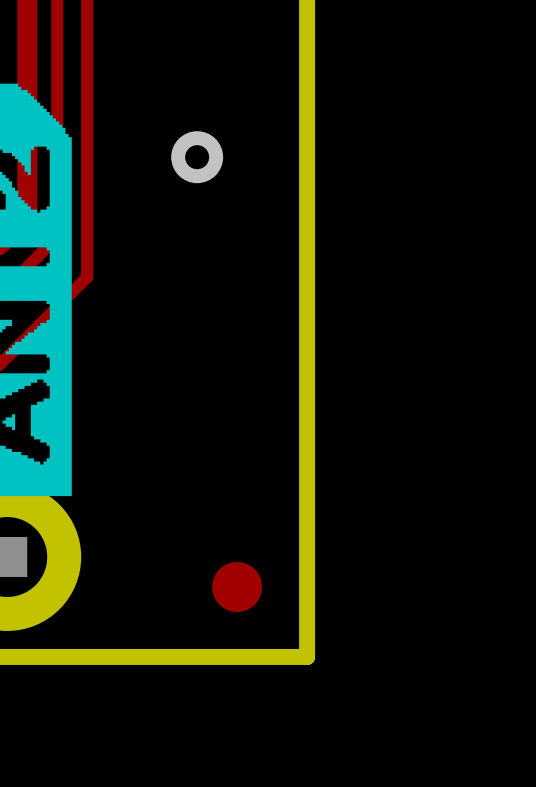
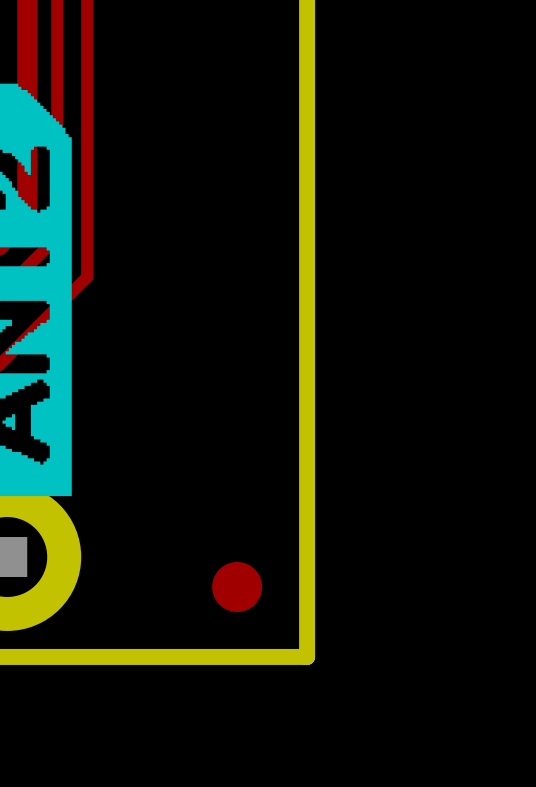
via: (197, 157) -> none

